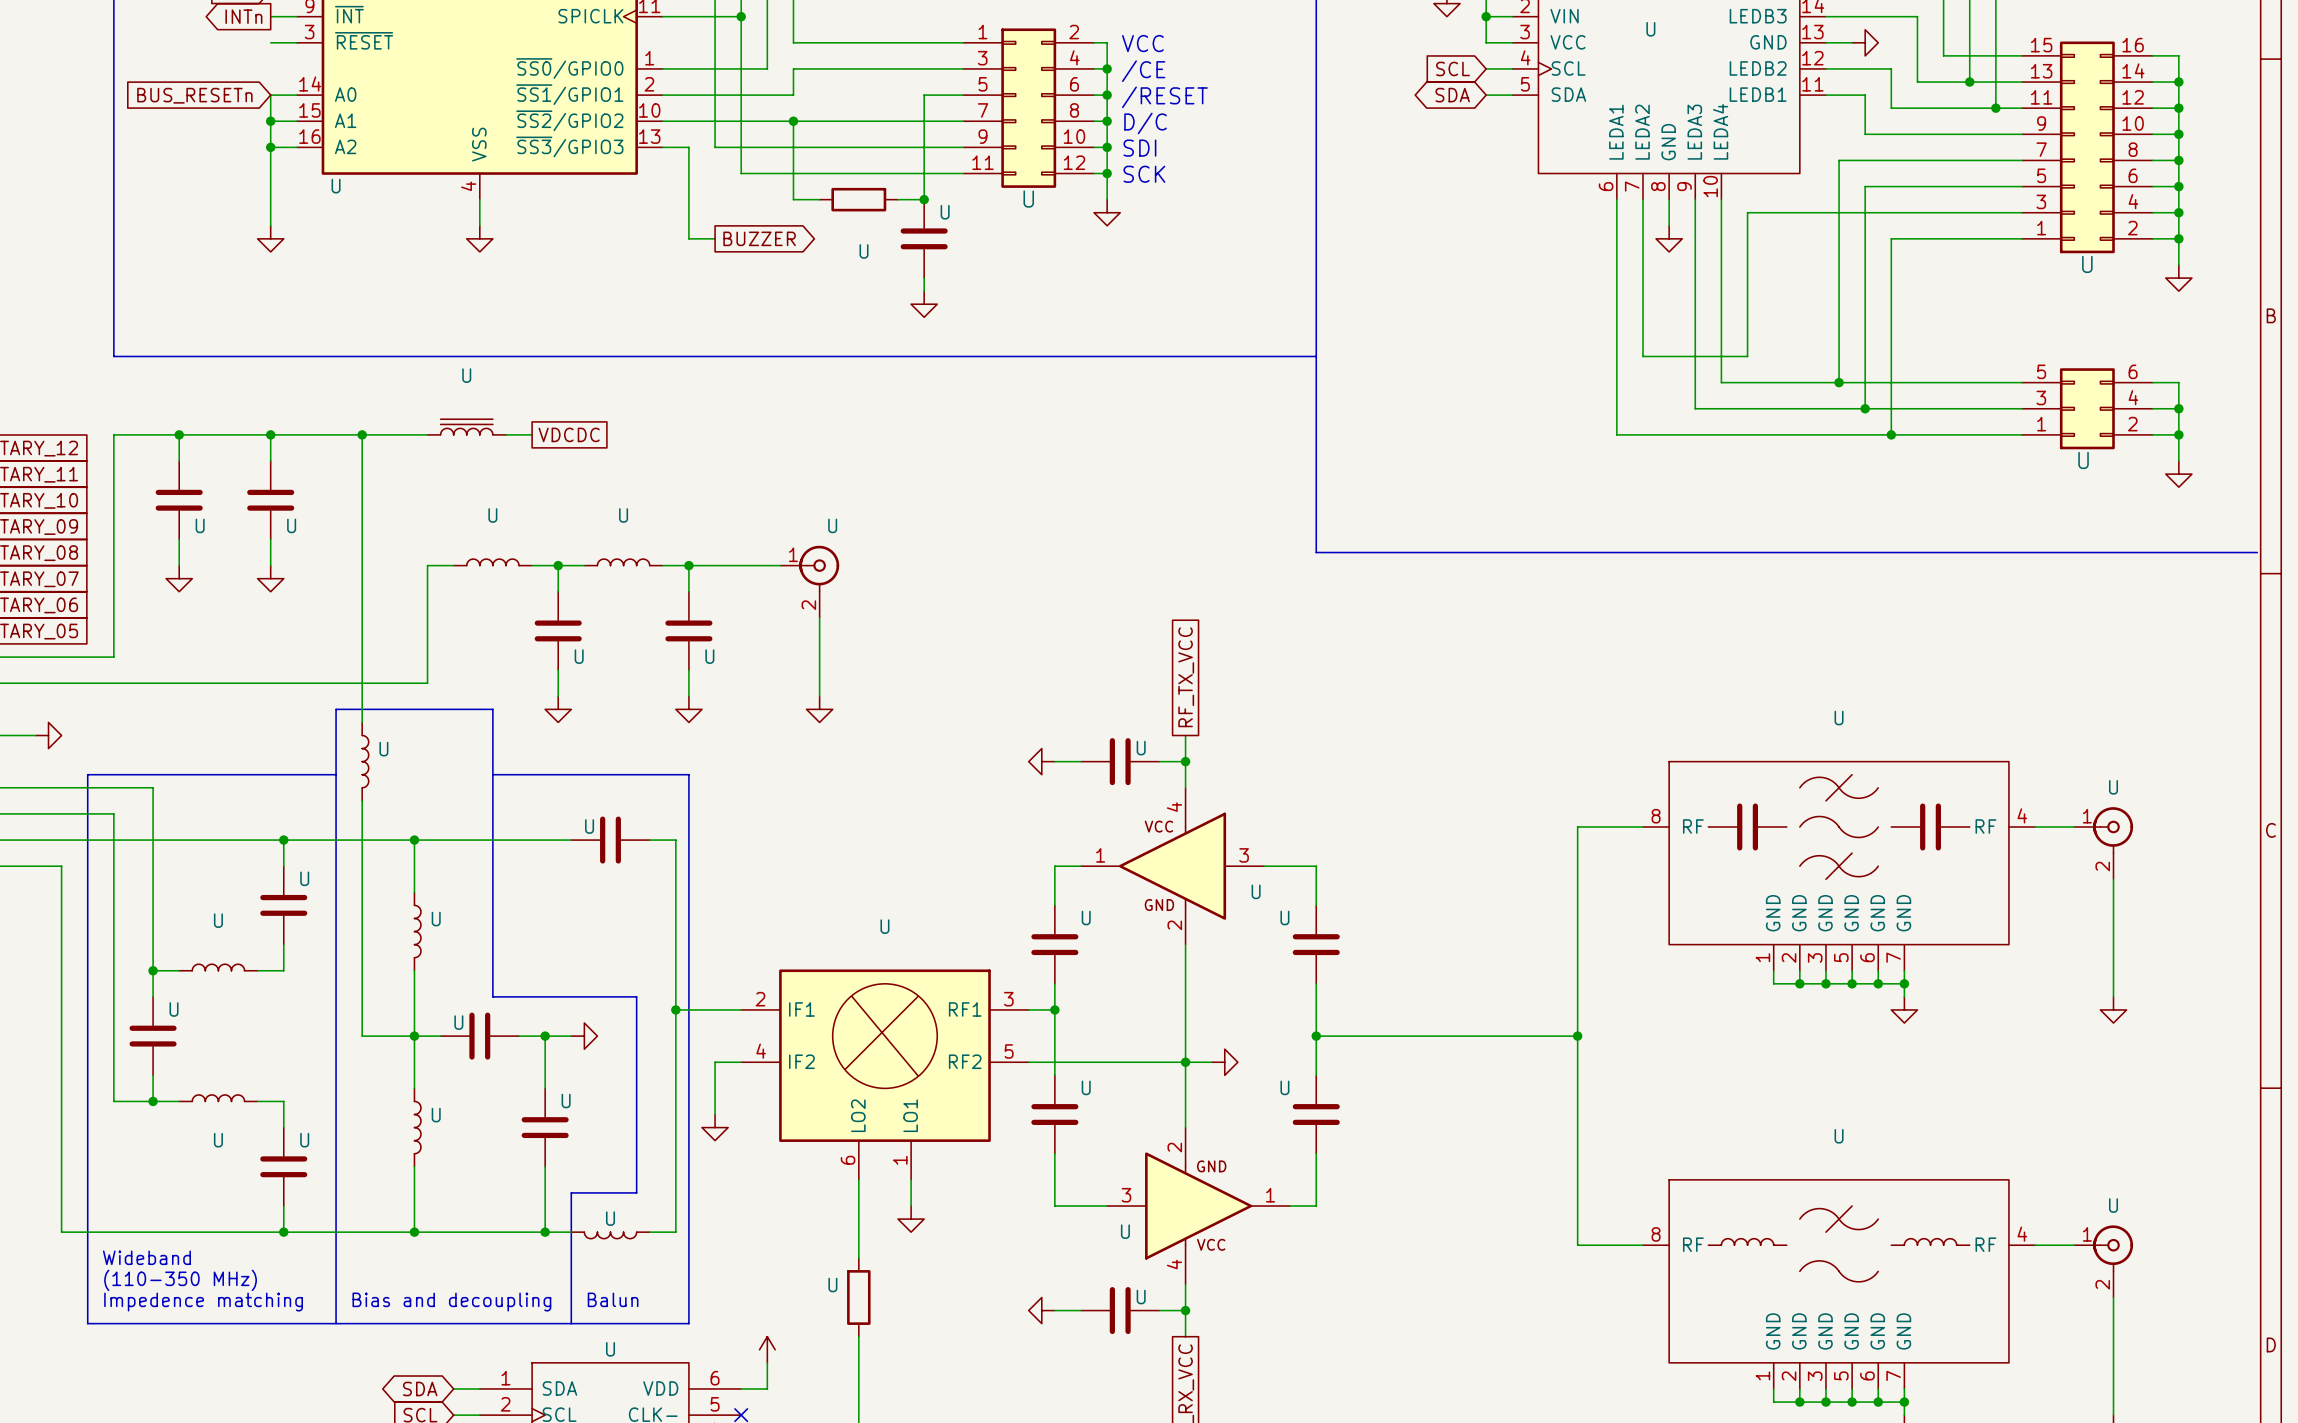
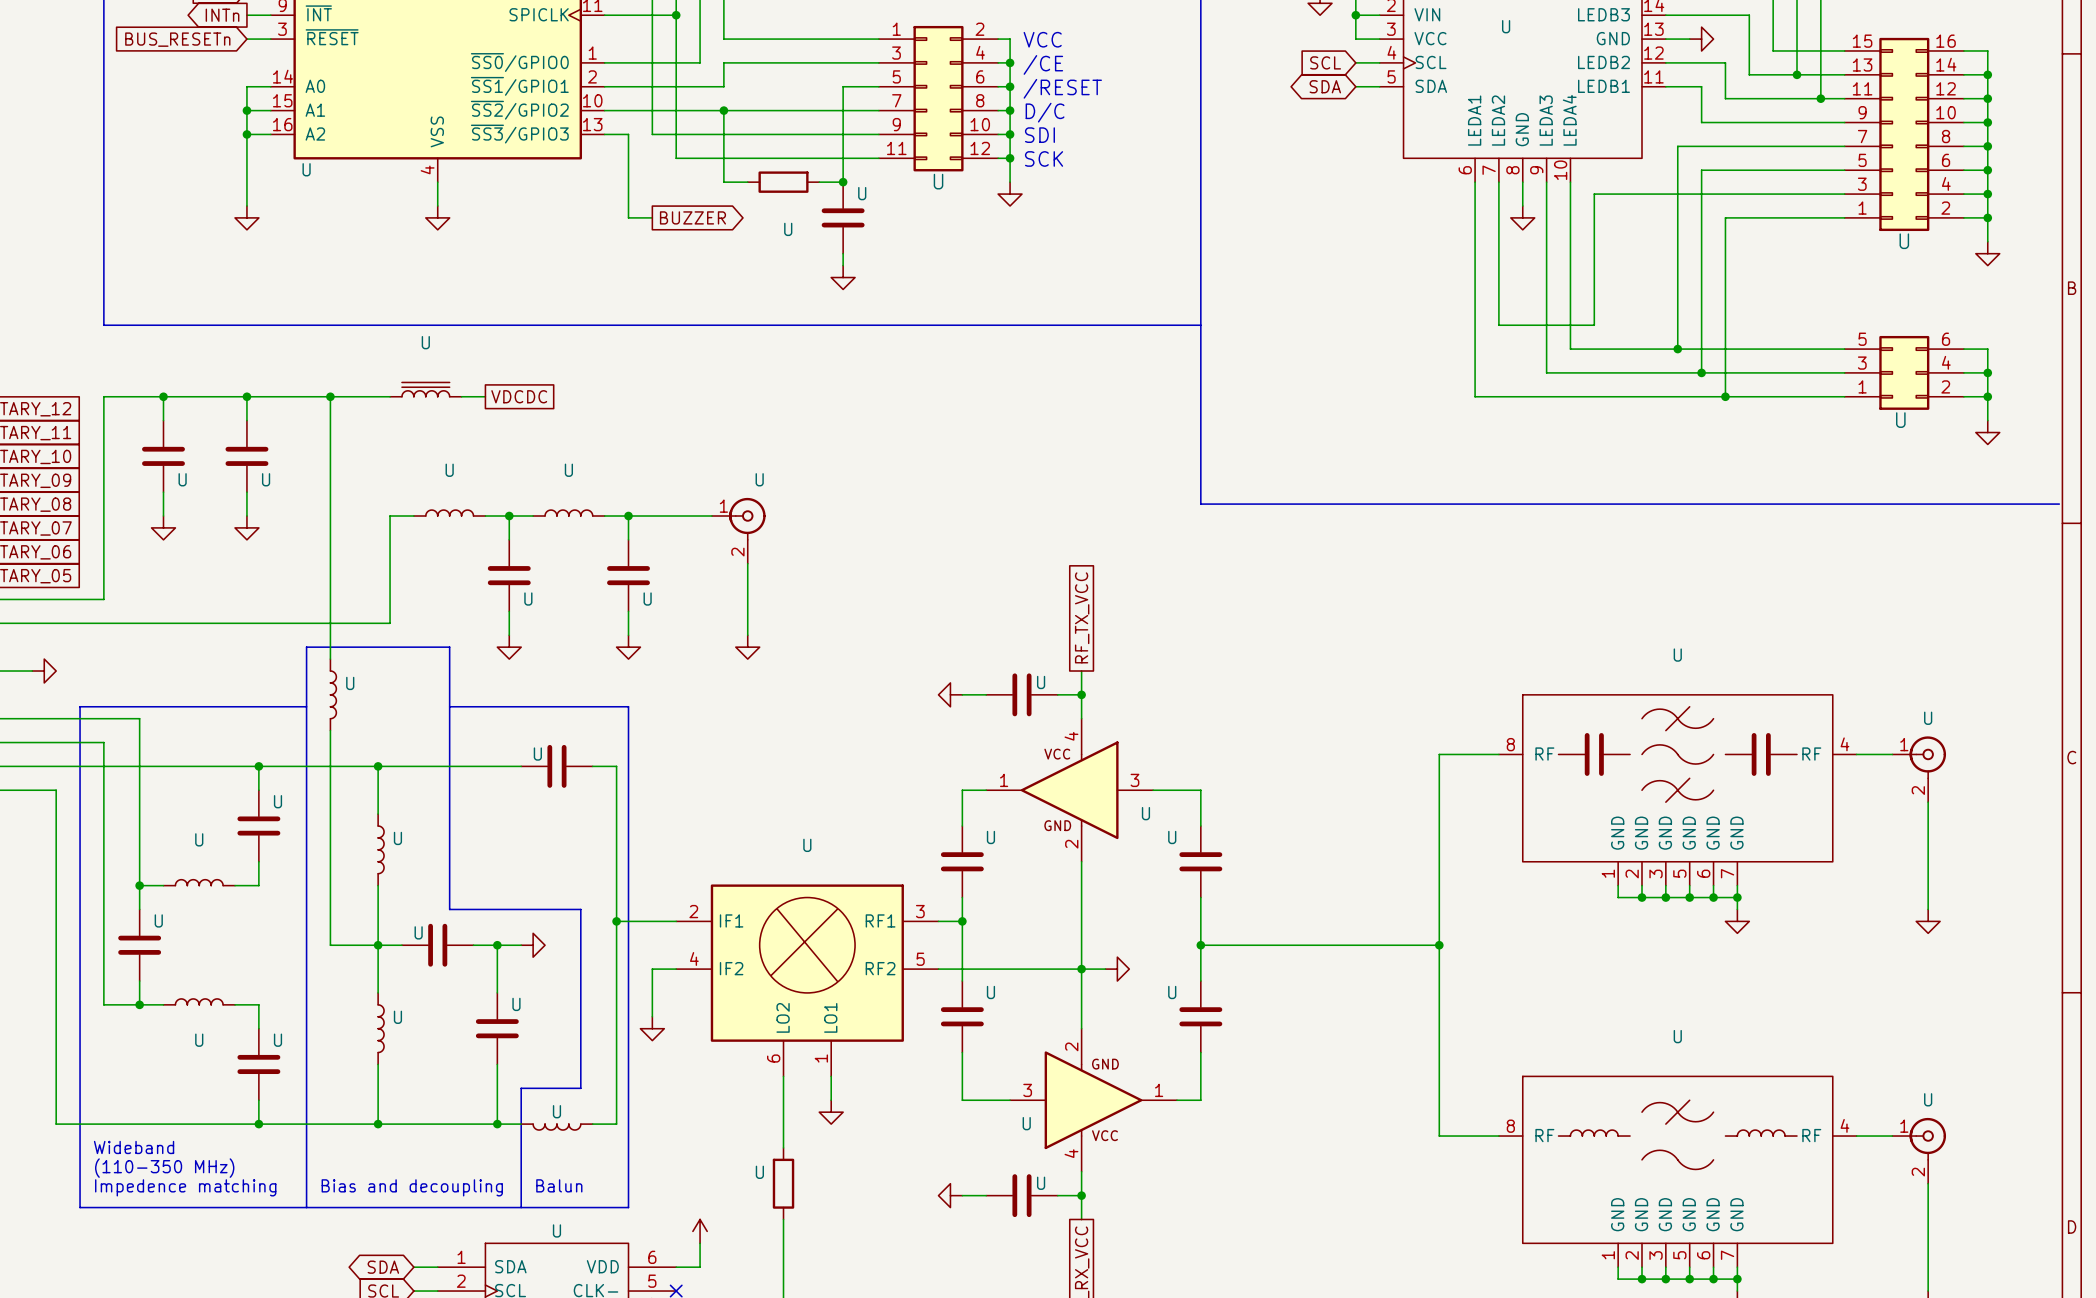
global label position: BUS_RESETn (194, 95) -> BUS_RESETn (177, 39)

